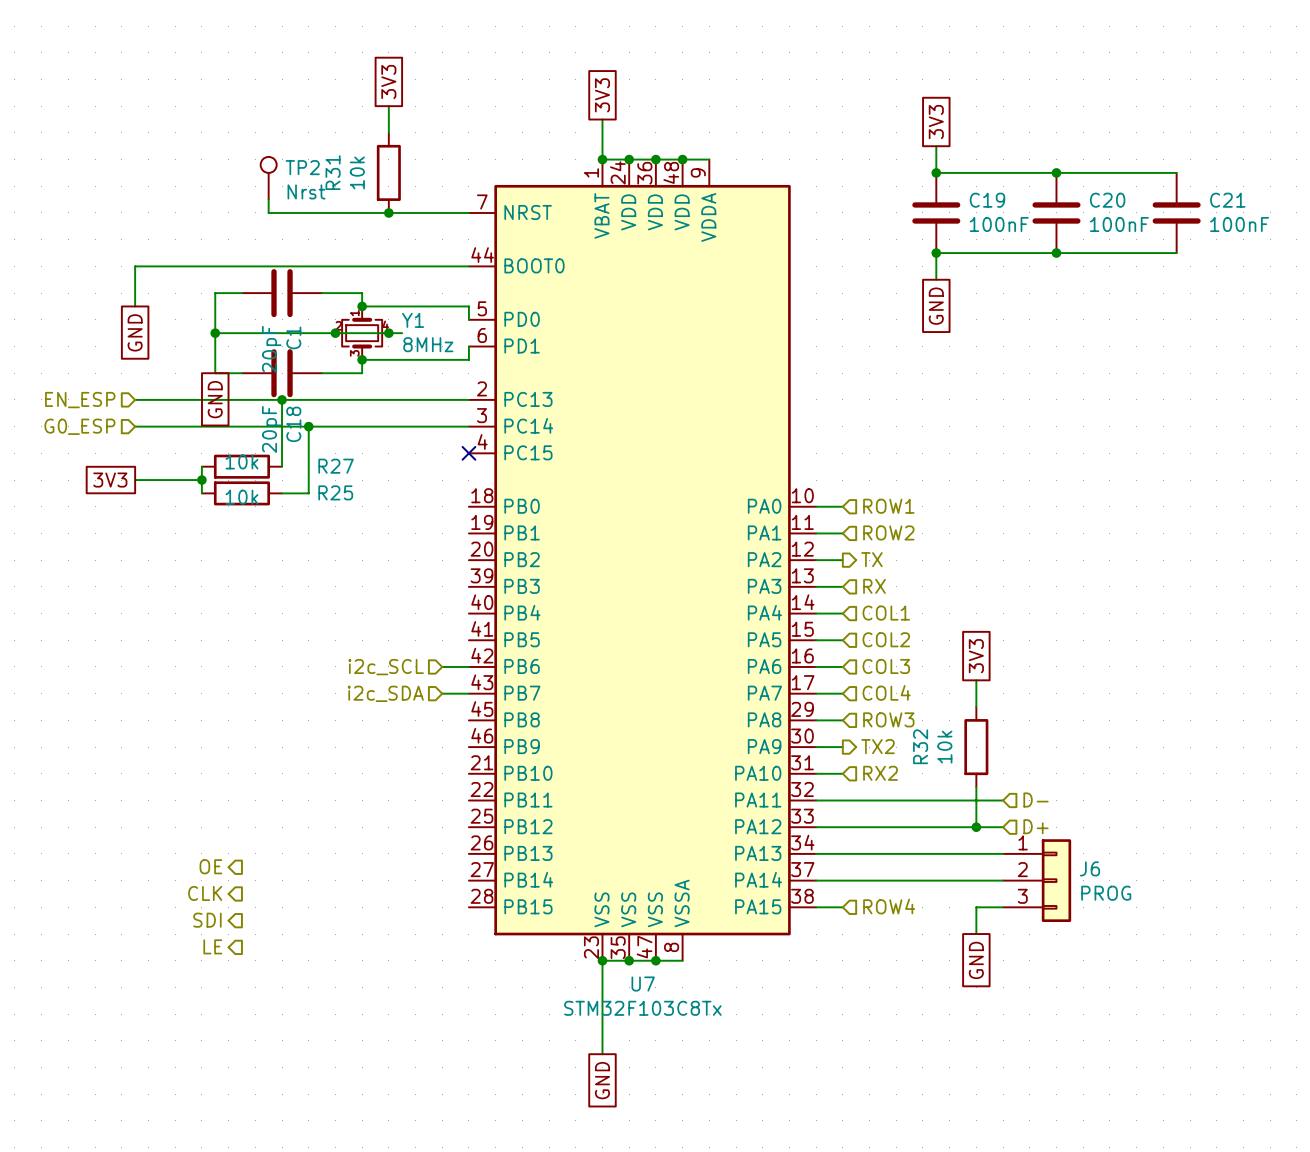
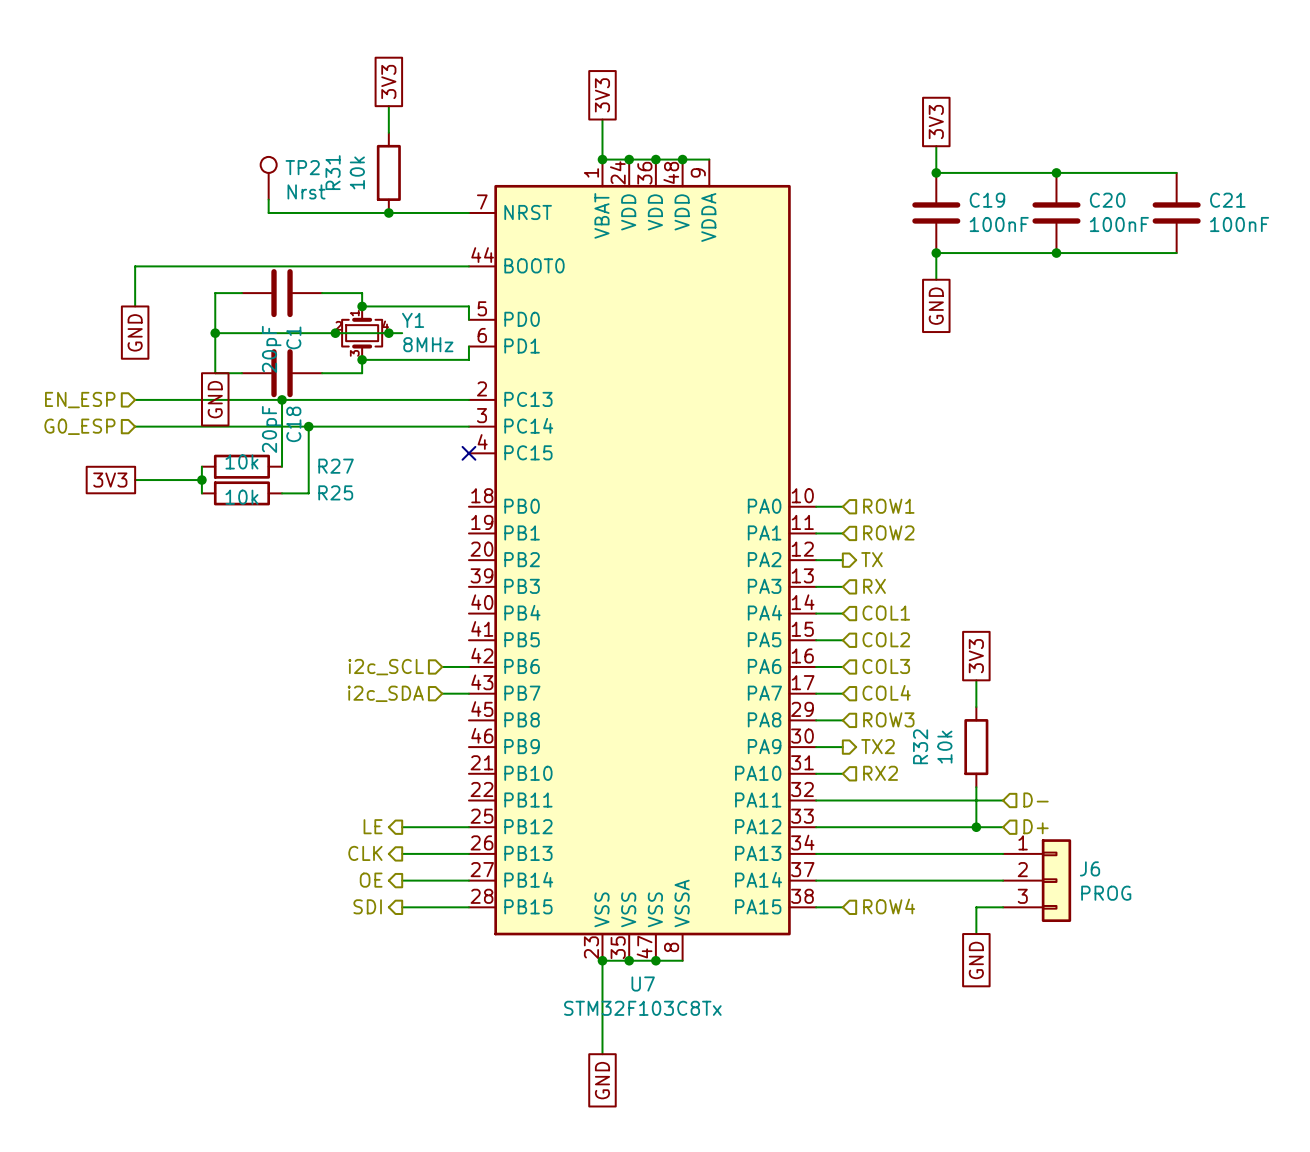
wire: none -> (402, 827) (468, 827)
wire: none -> (402, 853) (468, 853)
hierarchical label position: OE (210, 866) -> OE (371, 880)
wire: none -> (402, 880) (468, 880)
hierarchical label position: CLK (205, 893) -> CLK (365, 853)
wire: none -> (402, 907) (468, 907)
hierarchical label position: SDI (207, 920) -> SDI (367, 906)
hierarchical label position: LE (212, 946) -> LE (373, 826)

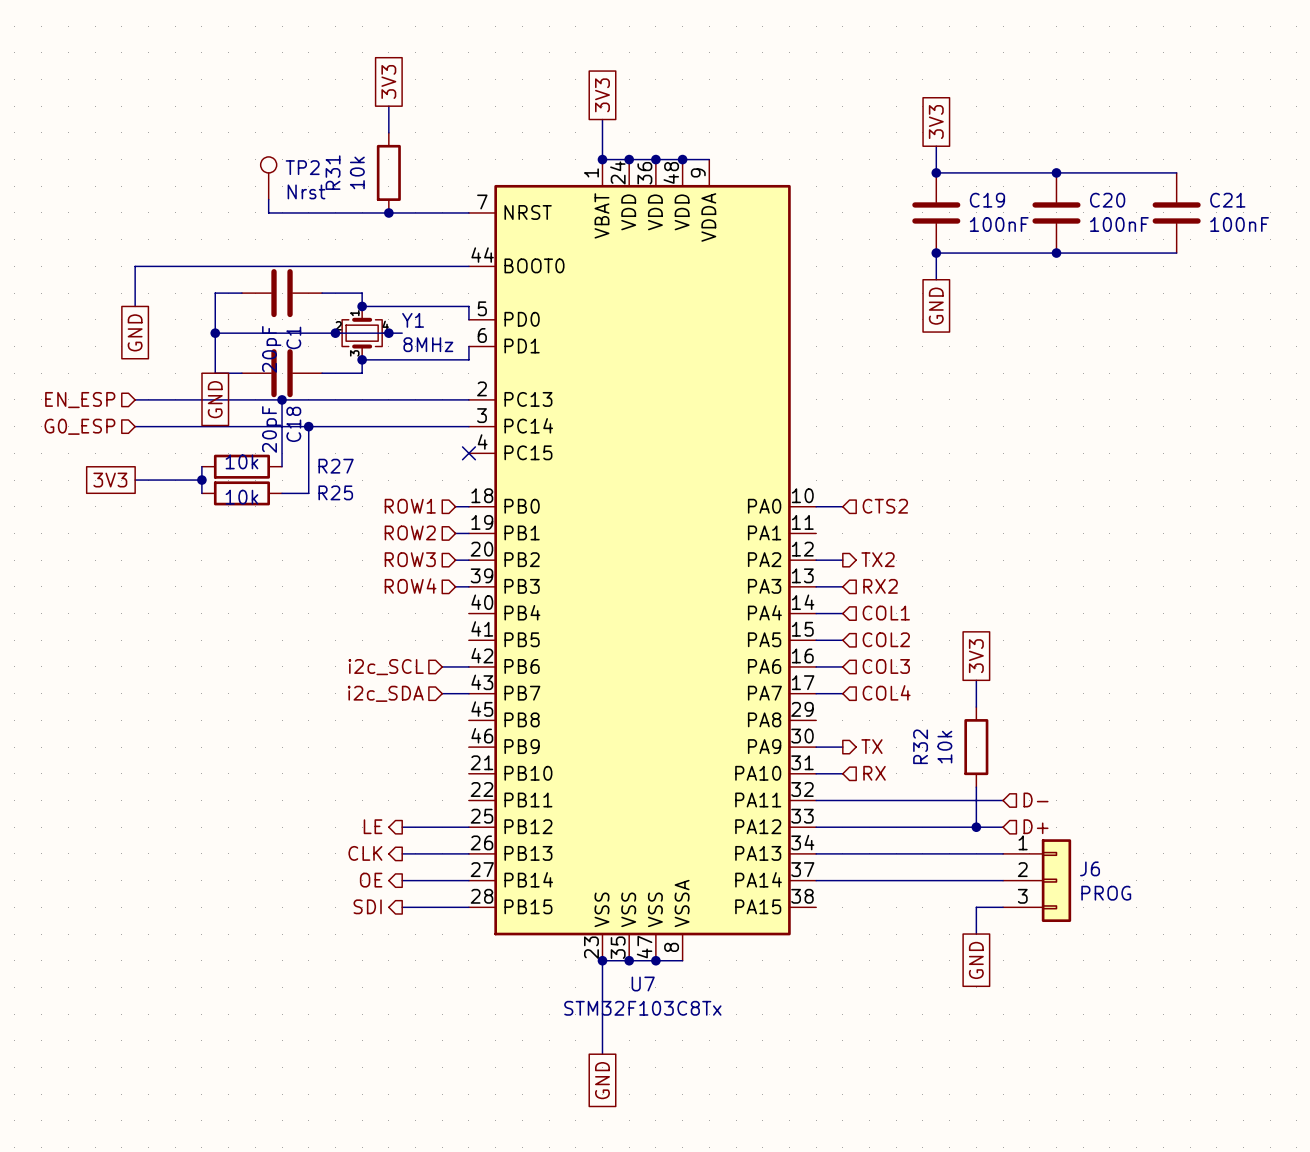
hierarchical label: none -> ROW1 (410, 506)
wire: none -> (455, 506) (468, 506)
hierarchical label: ROW1 (888, 506) -> CTS2 (885, 506)
hierarchical label: none -> ROW2 (410, 532)
hierarchical label: ROW2 (888, 532) -> none
wire: none -> (455, 533) (468, 533)
wire: (816, 533) (842, 533) -> none
hierarchical label: none -> ROW3 (410, 559)
hierarchical label: TX (871, 559) -> TX2 (878, 559)
wire: none -> (455, 560) (468, 560)
hierarchical label: none -> ROW4 (410, 586)
wire: none -> (455, 586) (468, 586)
hierarchical label: RX (874, 586) -> RX2 (880, 586)
hierarchical label: ROW3 (888, 719) -> none
wire: (816, 720) (842, 720) -> none
hierarchical label: TX2 (878, 746) -> TX (871, 746)
hierarchical label: RX2 (880, 773) -> RX (874, 773)
hierarchical label: ROW4 (889, 906) -> none
wire: (816, 907) (842, 907) -> none

